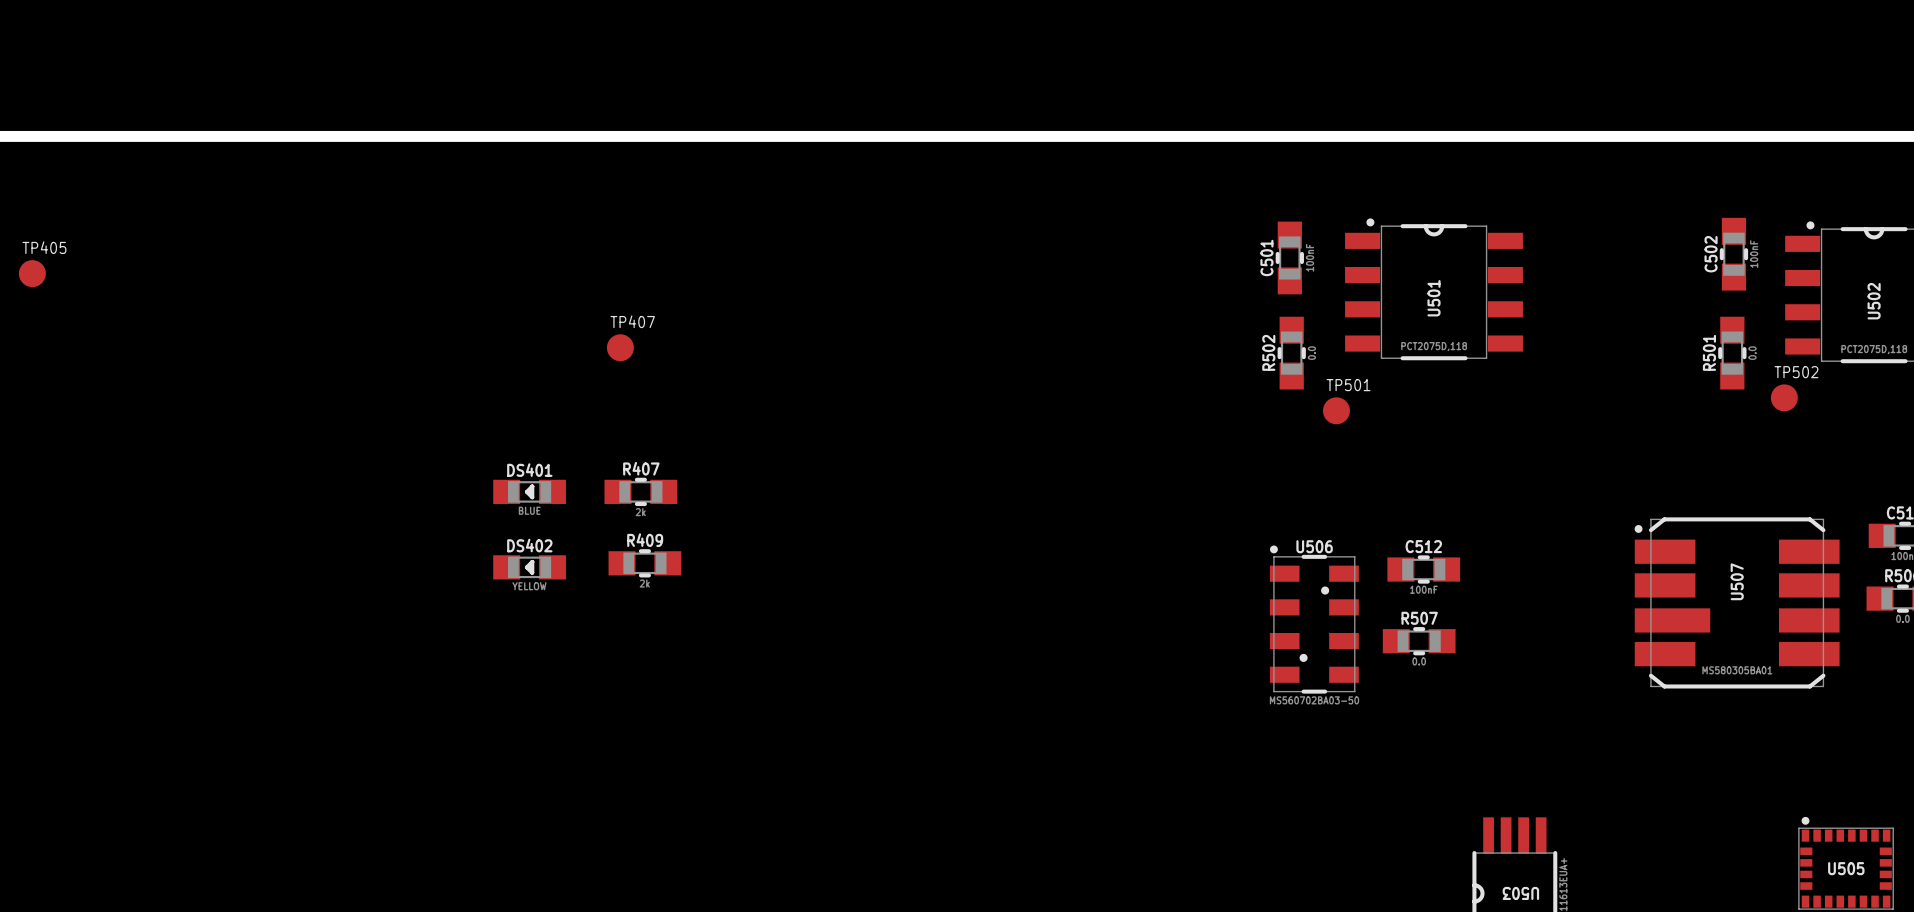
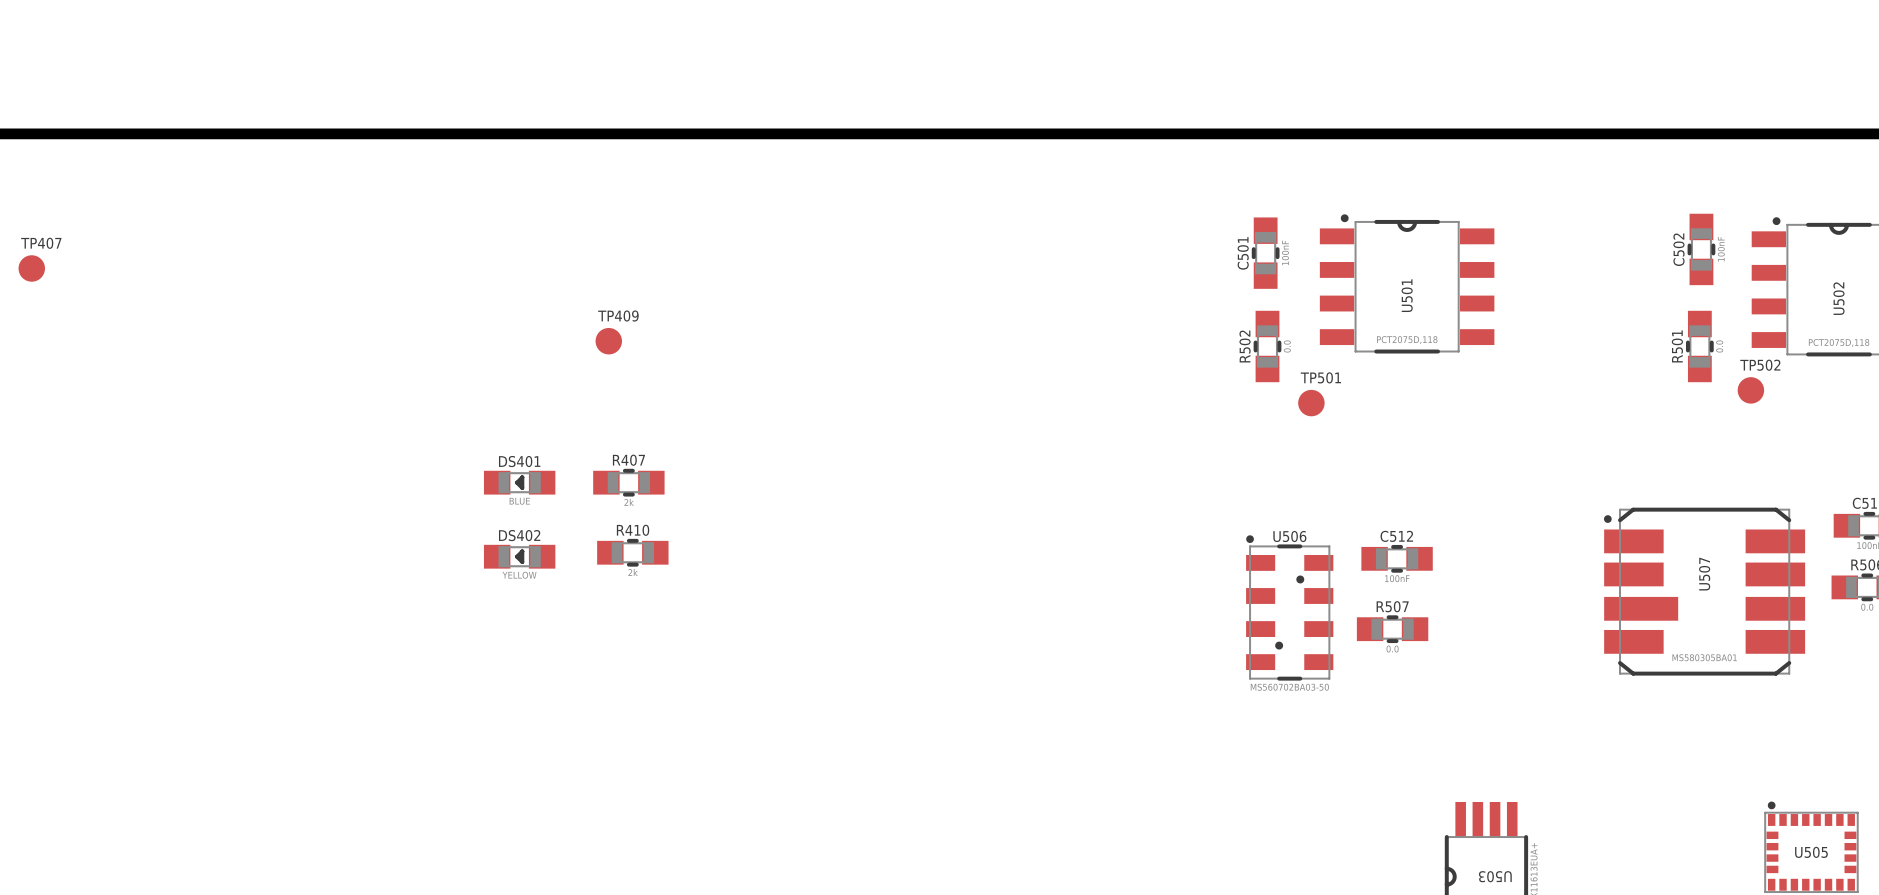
TP405 name: TP405 (44, 247) -> TP407 (41, 243)
TP407 name: TP407 (632, 321) -> TP409 (618, 316)
R409 name: R409 (645, 540) -> R410 (633, 530)

